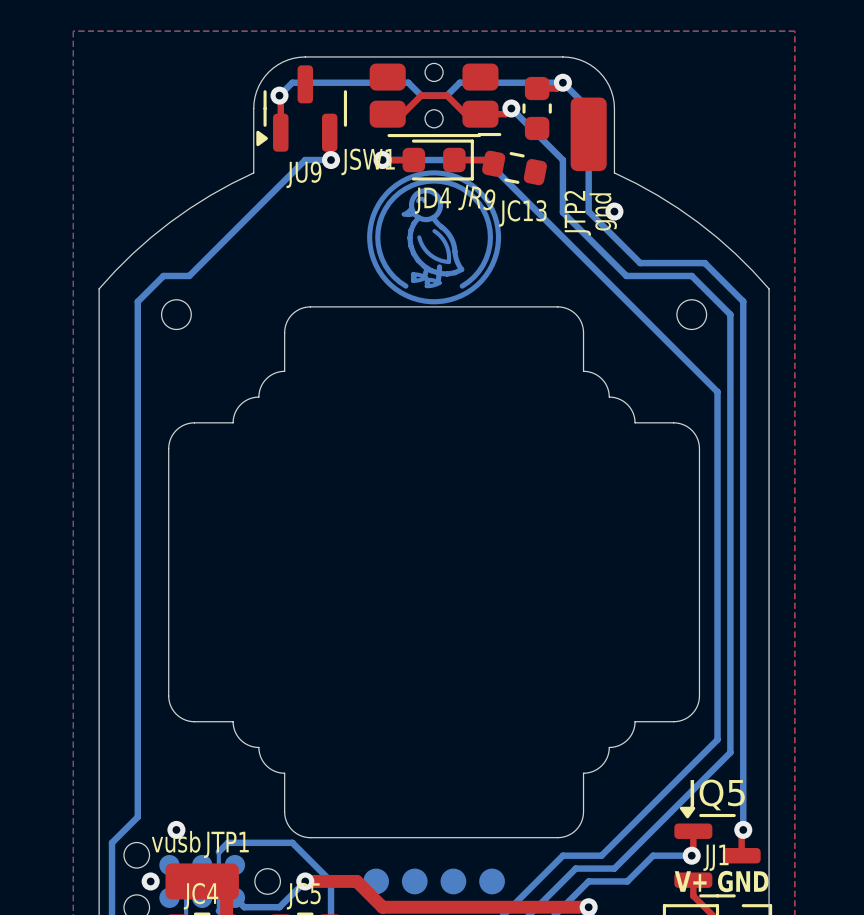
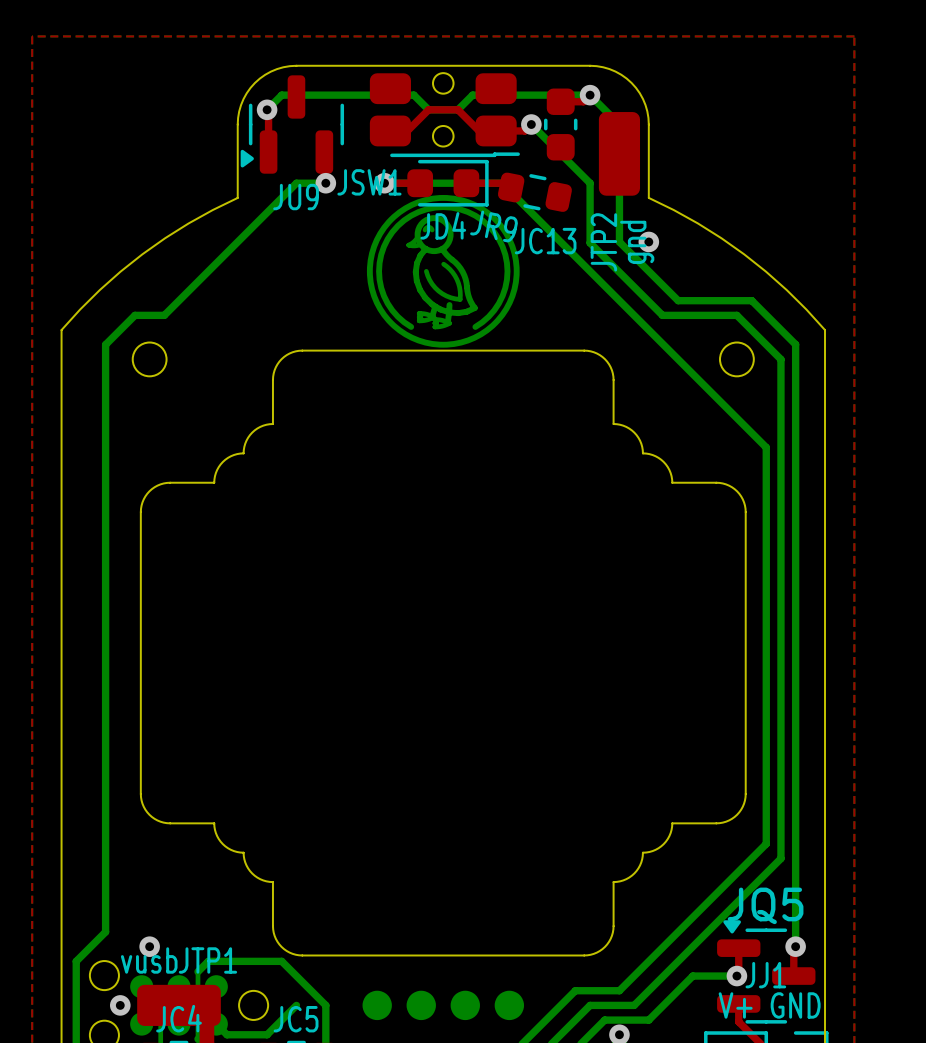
bottom track: (601, 855) (562, 855) (550, 868) -> none
bottom track: (575, 868) (562, 881) -> (604, 990) (575, 990)
bottom track: (588, 868) (614, 868) -> (619, 990) (634, 976)
top track: (305, 881) (356, 881) (382, 907) (588, 907) -> none
via: (305, 881) -> none
bottom track: (588, 881) (575, 894) -> (619, 1005) (590, 1005)
bottom track: (601, 881) (627, 881) -> (634, 1005) (648, 990)
bottom track: none -> (663, 1005) (648, 1020) (604, 1020)

